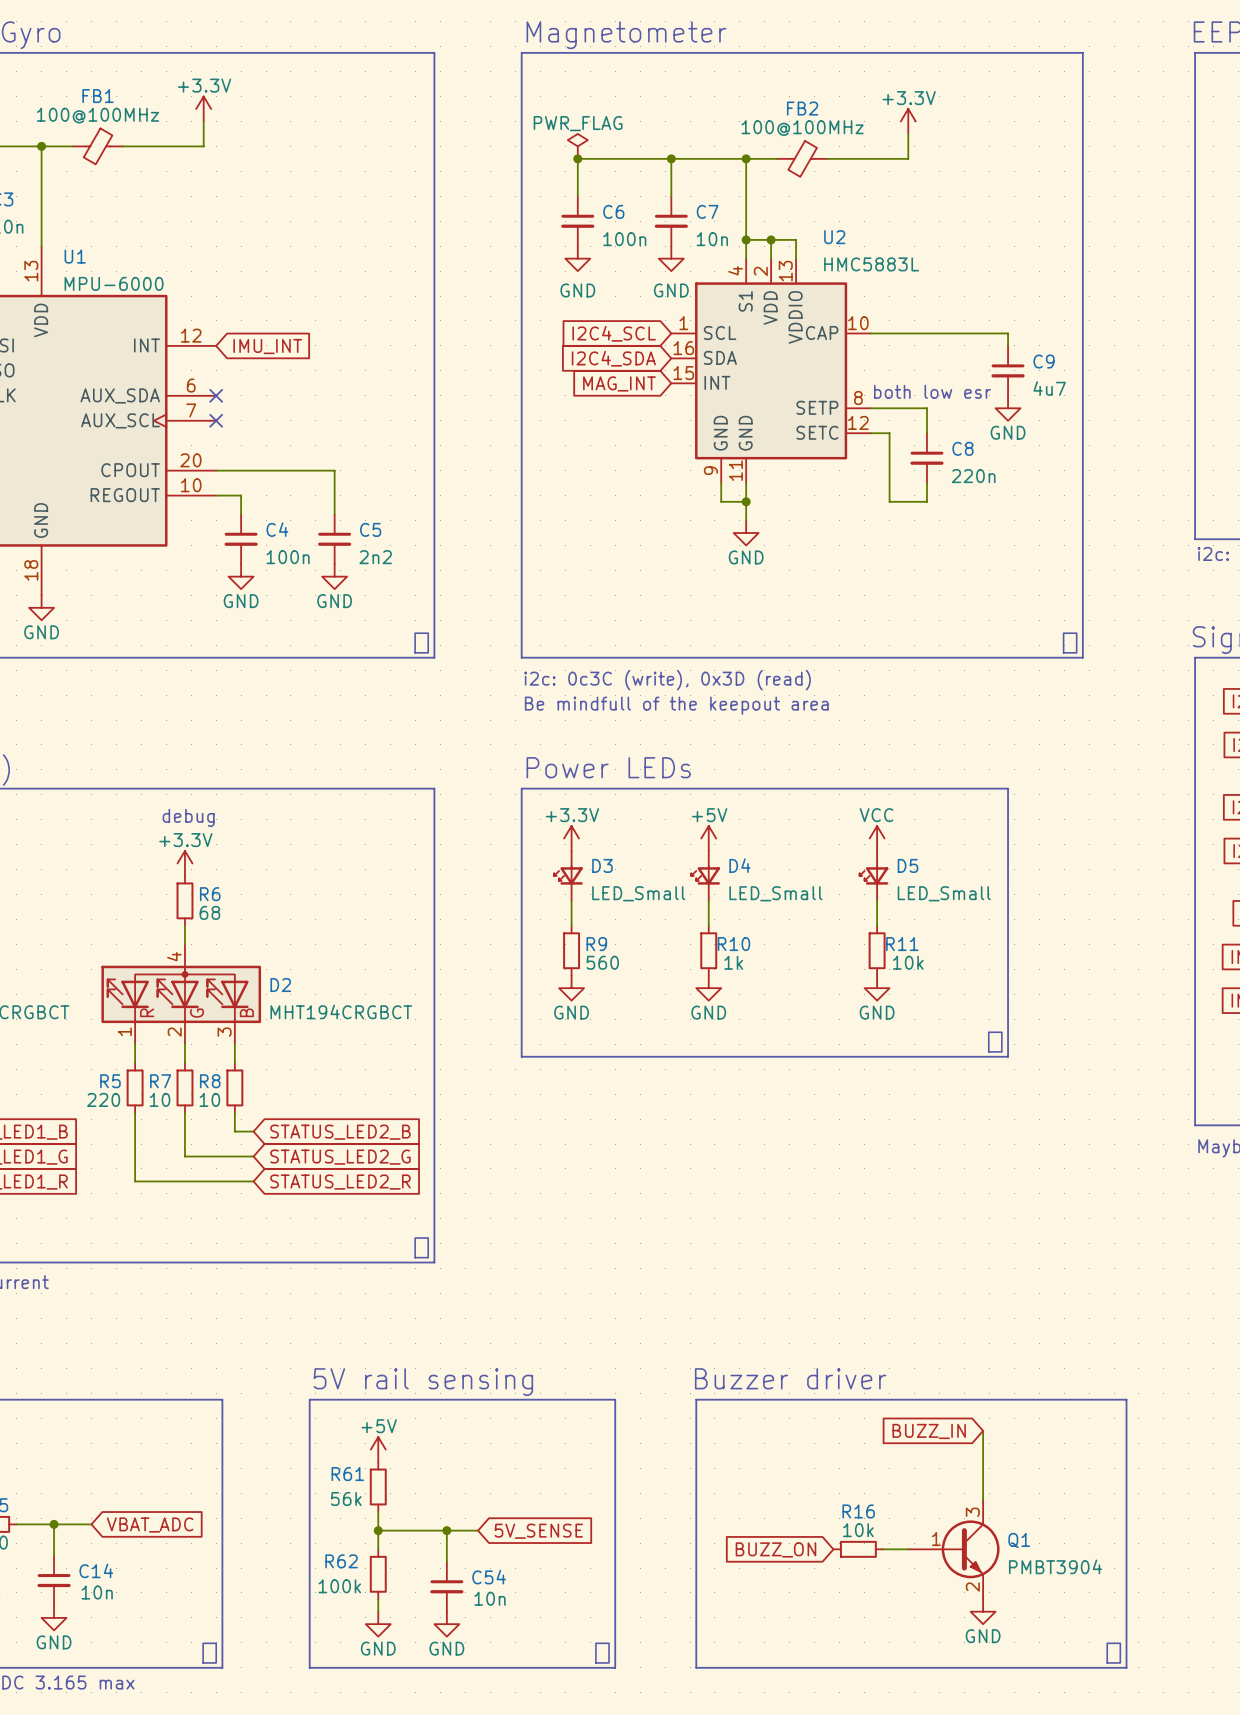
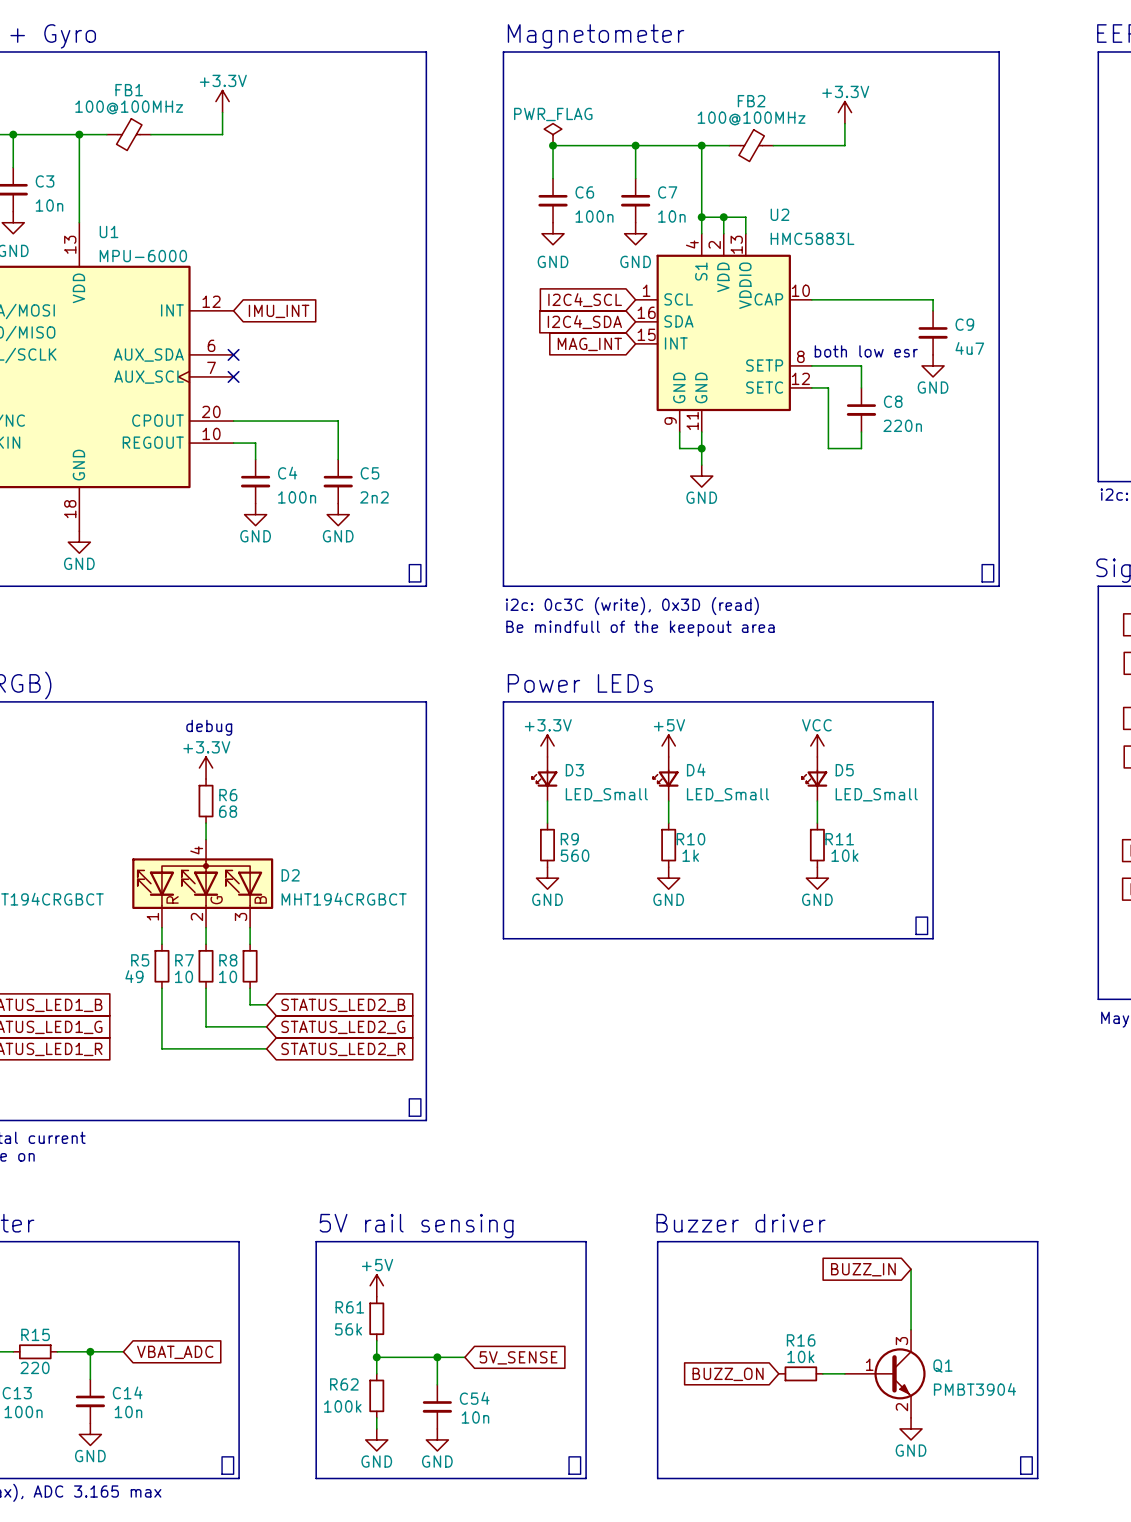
R5 value: 220 (103, 1099) -> 49 (134, 976)

